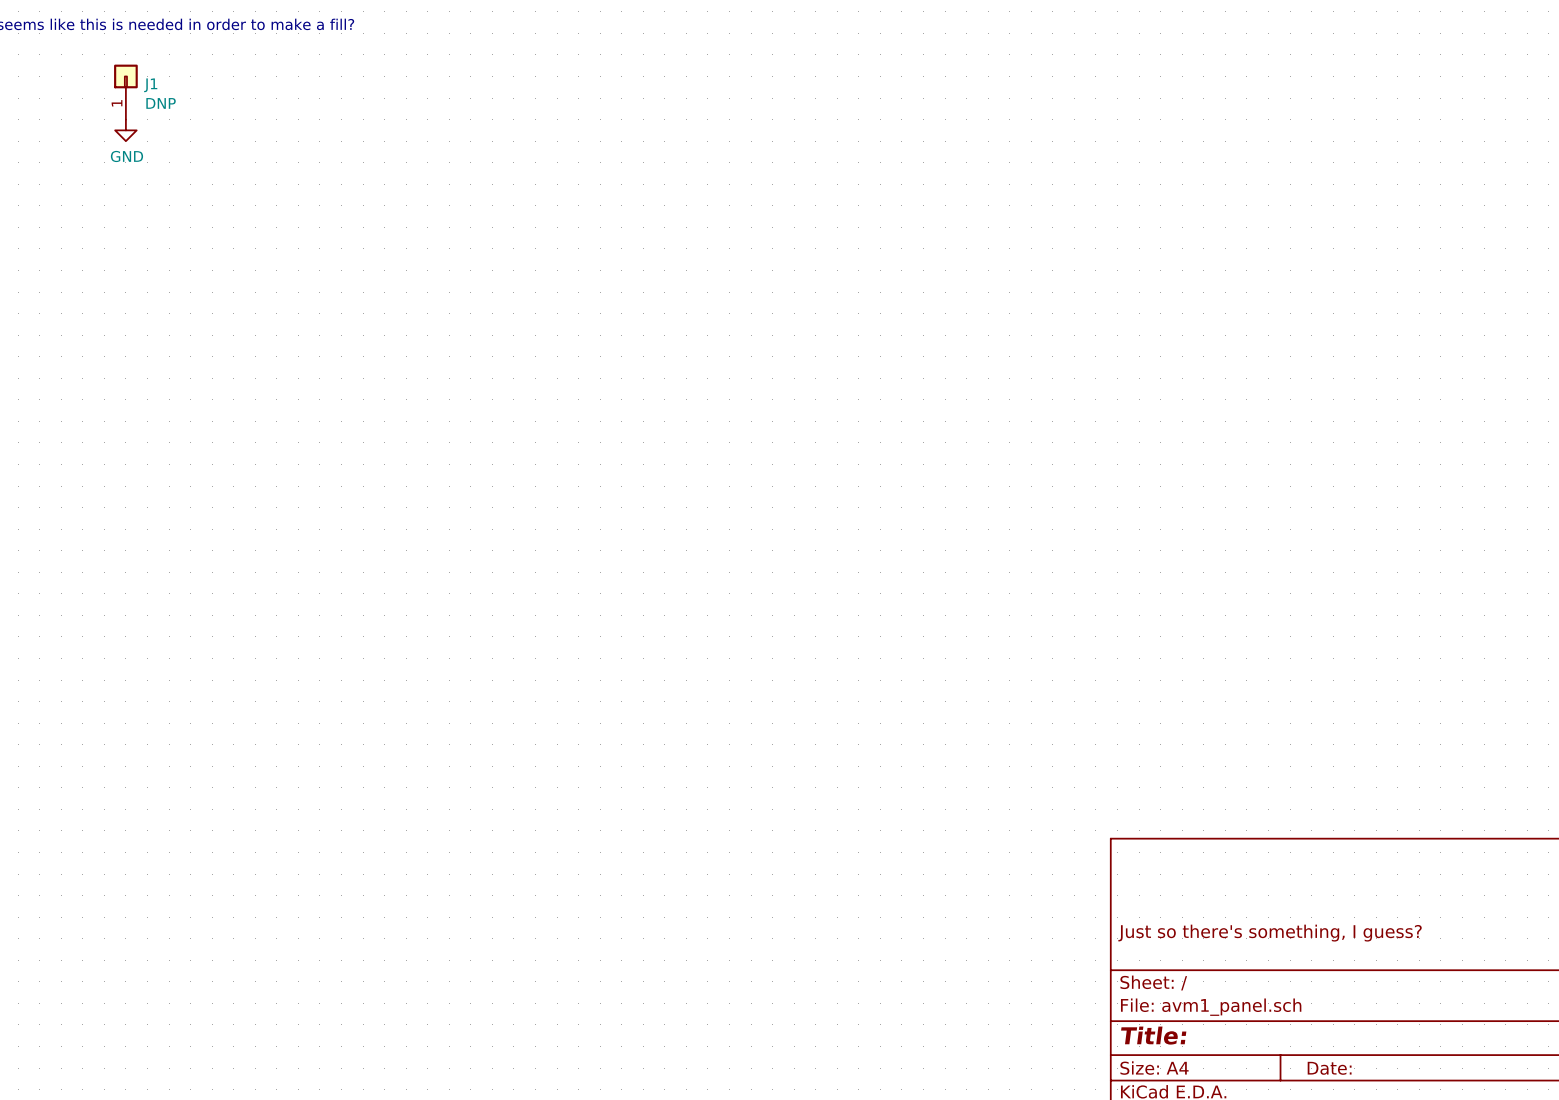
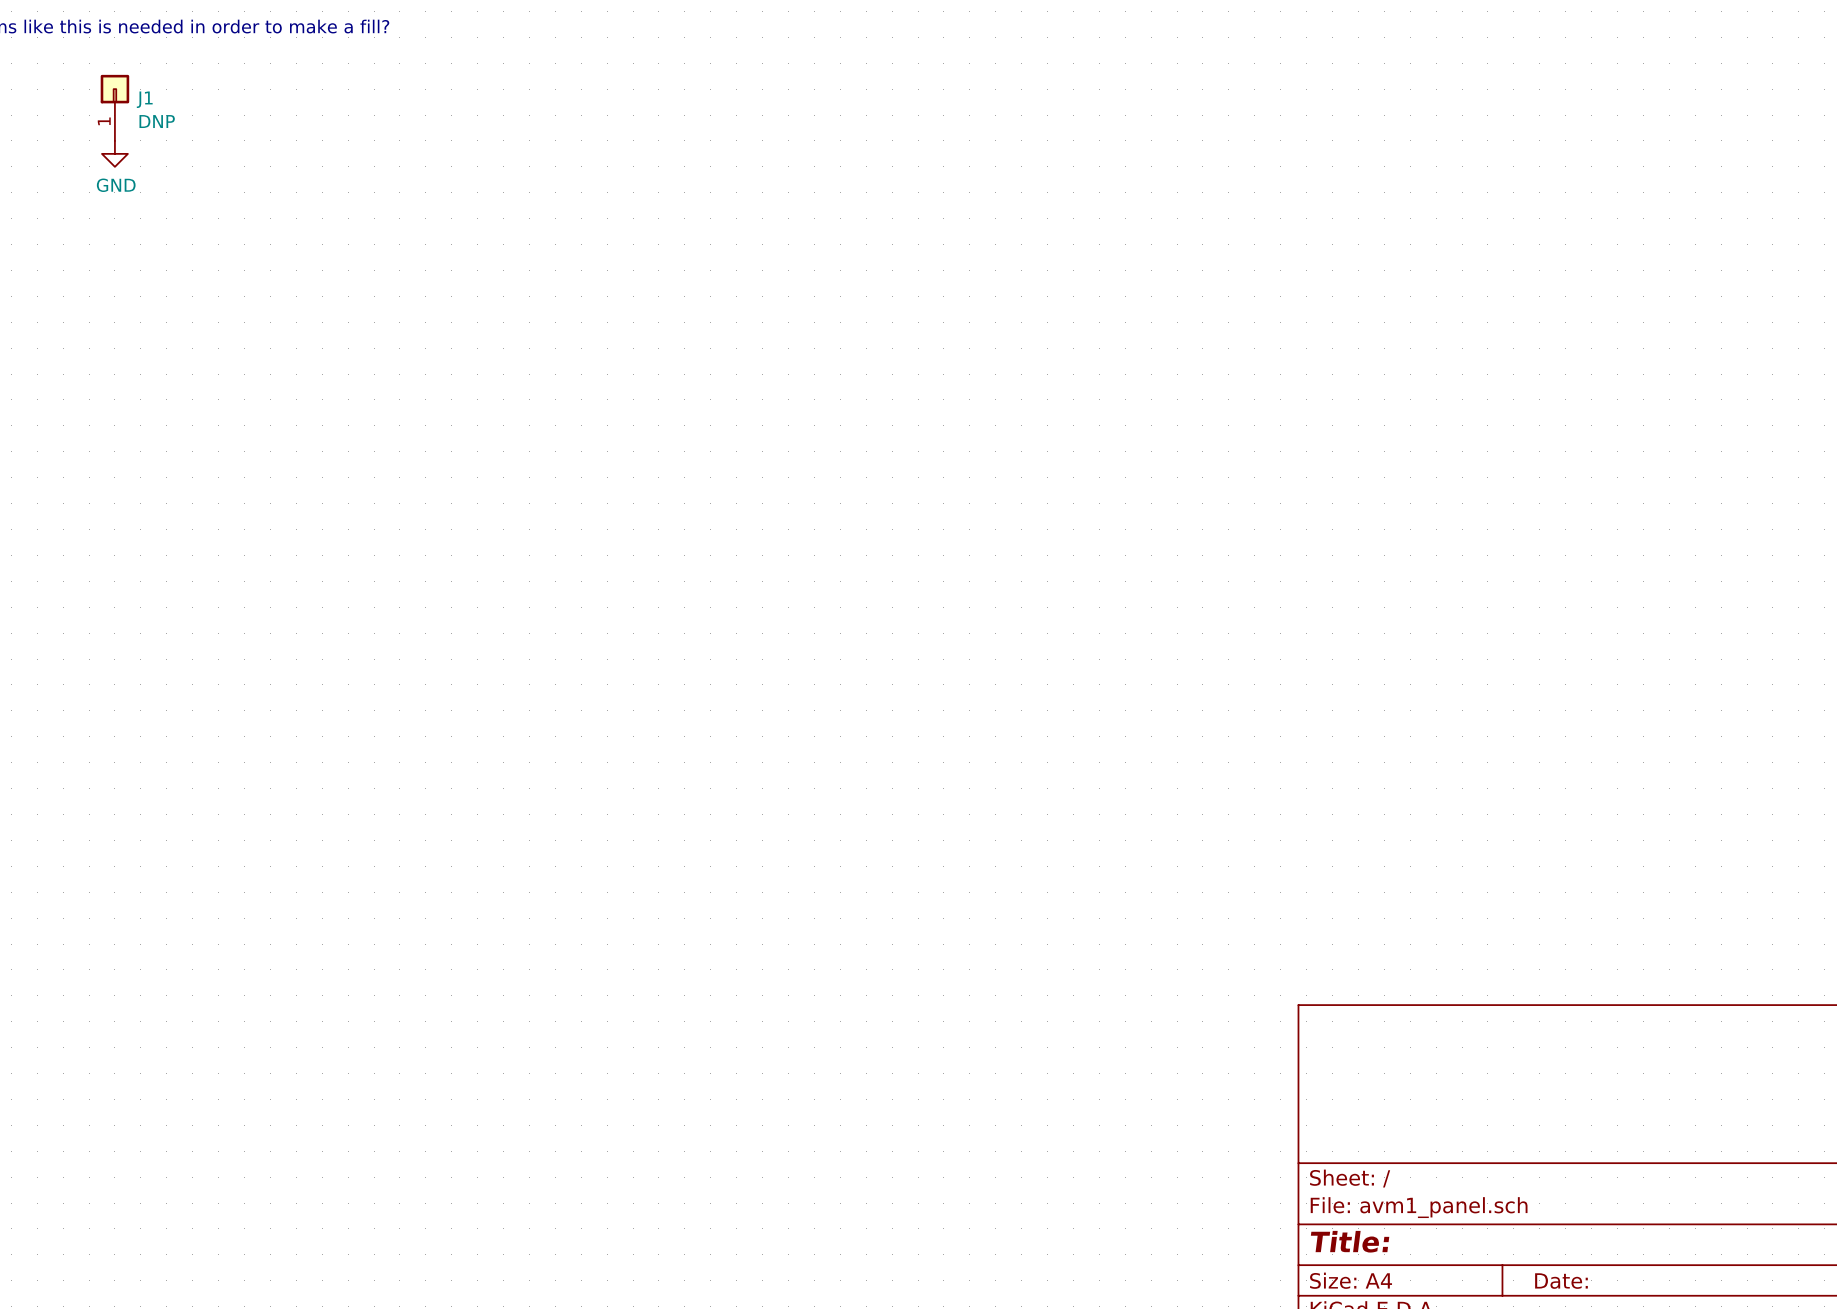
title block: Just so there's something, I guess? (1270, 933) -> none

